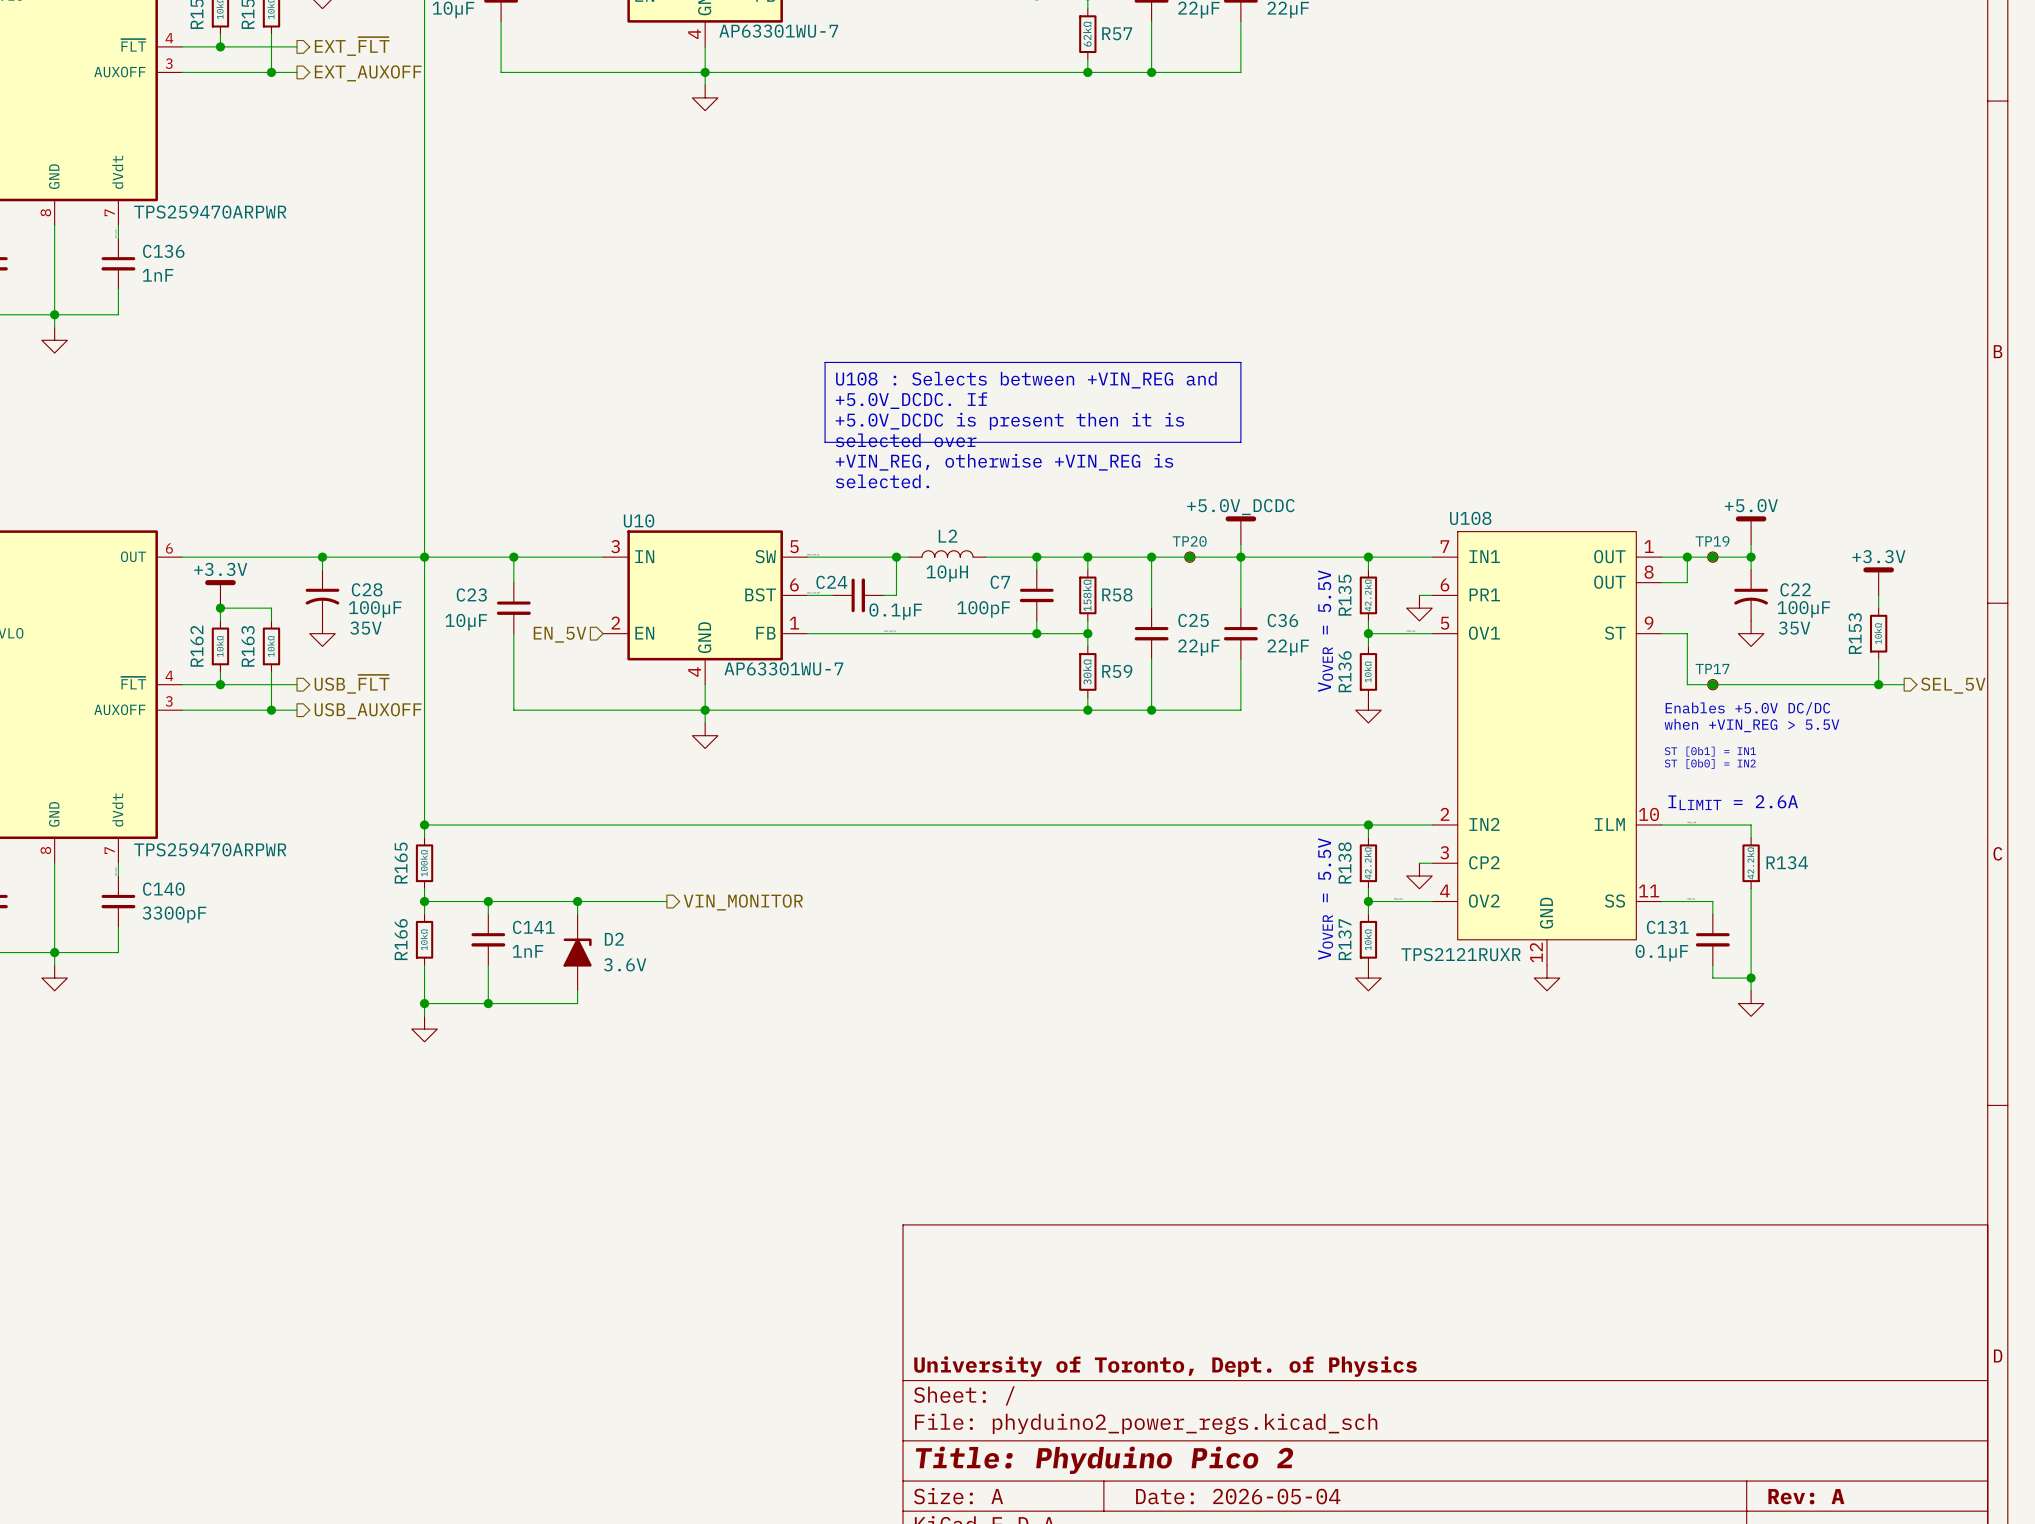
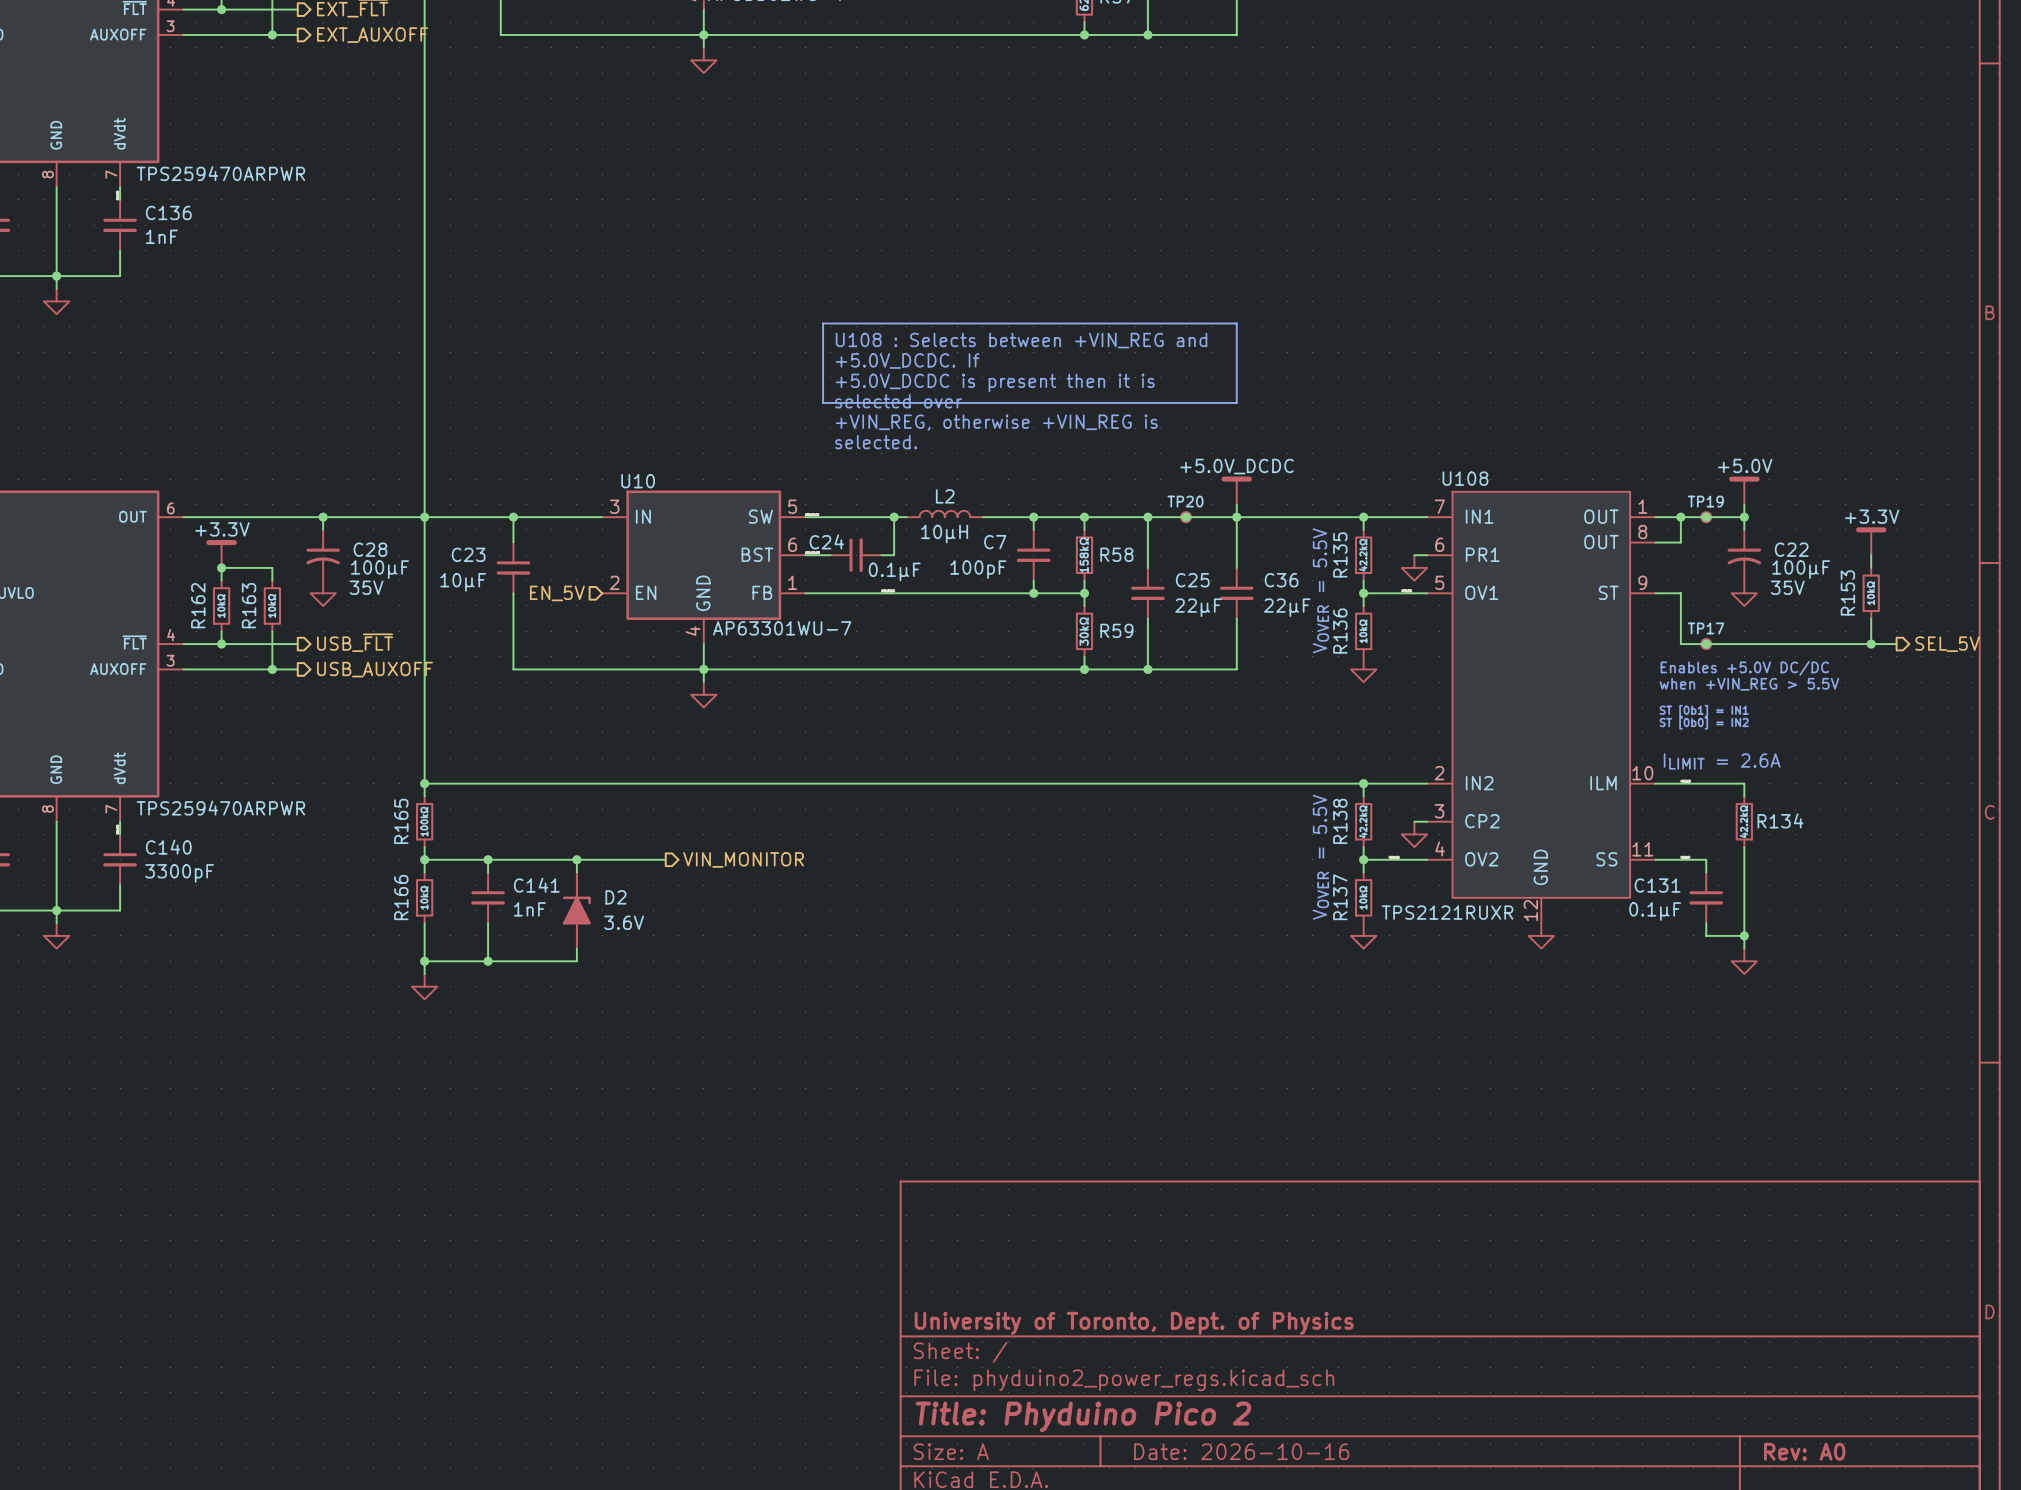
title block: Date: 2026-05-04 (1238, 1496) -> Date: 2026-10-16 (1241, 1451)
title block: Rev: A (1806, 1496) -> Rev: A0 (1804, 1451)

